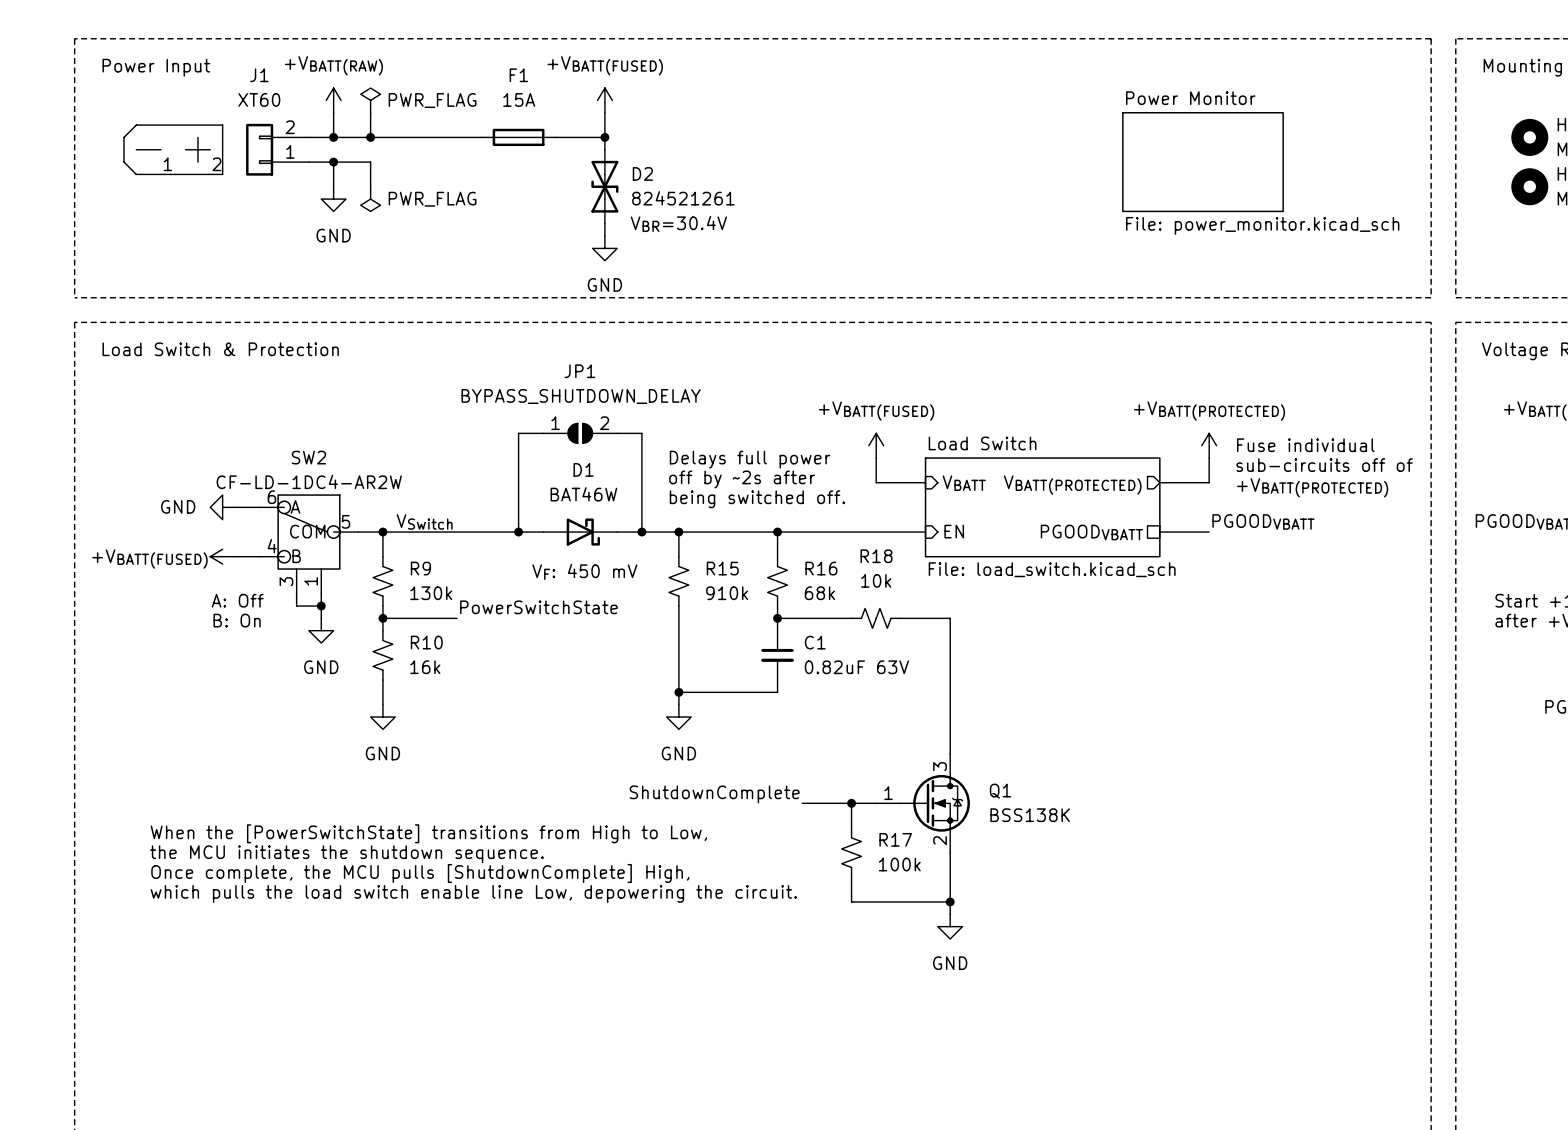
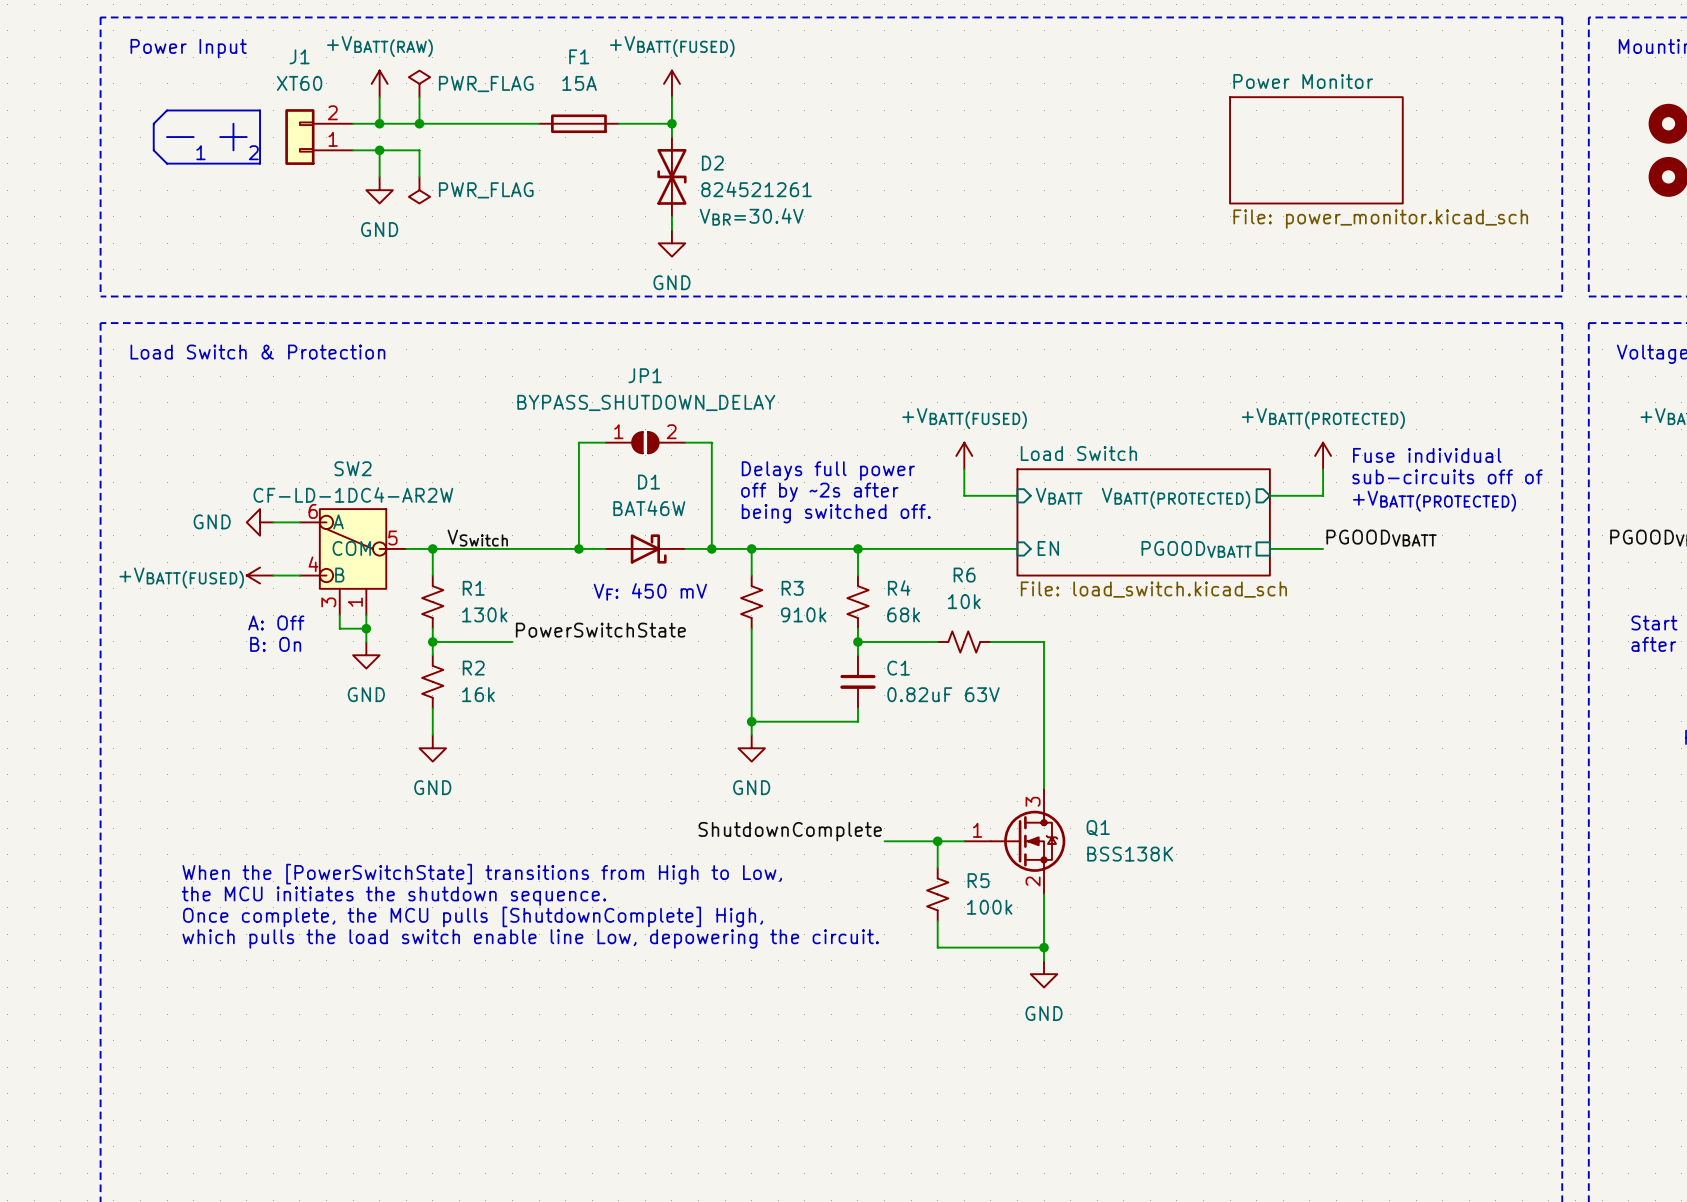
R18 name: R18 (876, 556) -> R6 (964, 575)
R9 name: R9 (420, 568) -> R1 (473, 588)
R15 name: R15 (722, 568) -> R3 (792, 588)
R16 name: R16 (821, 568) -> R4 (899, 588)
R10 name: R10 (426, 642) -> R2 (473, 668)
R17 name: R17 (895, 839) -> R5 (978, 880)

